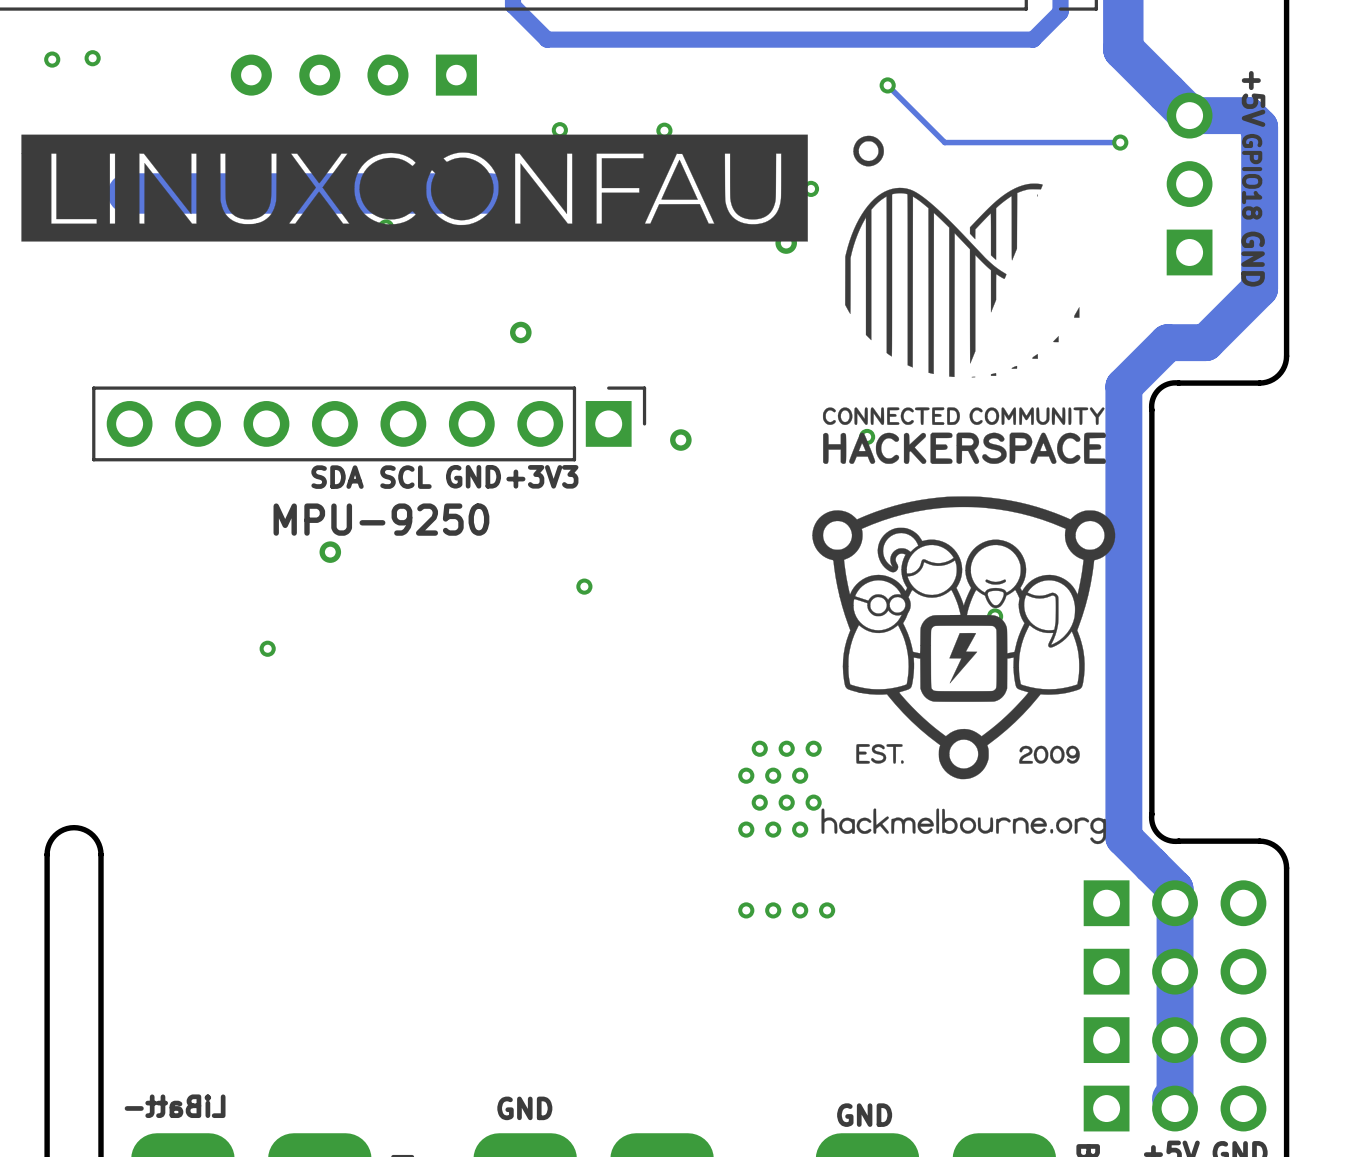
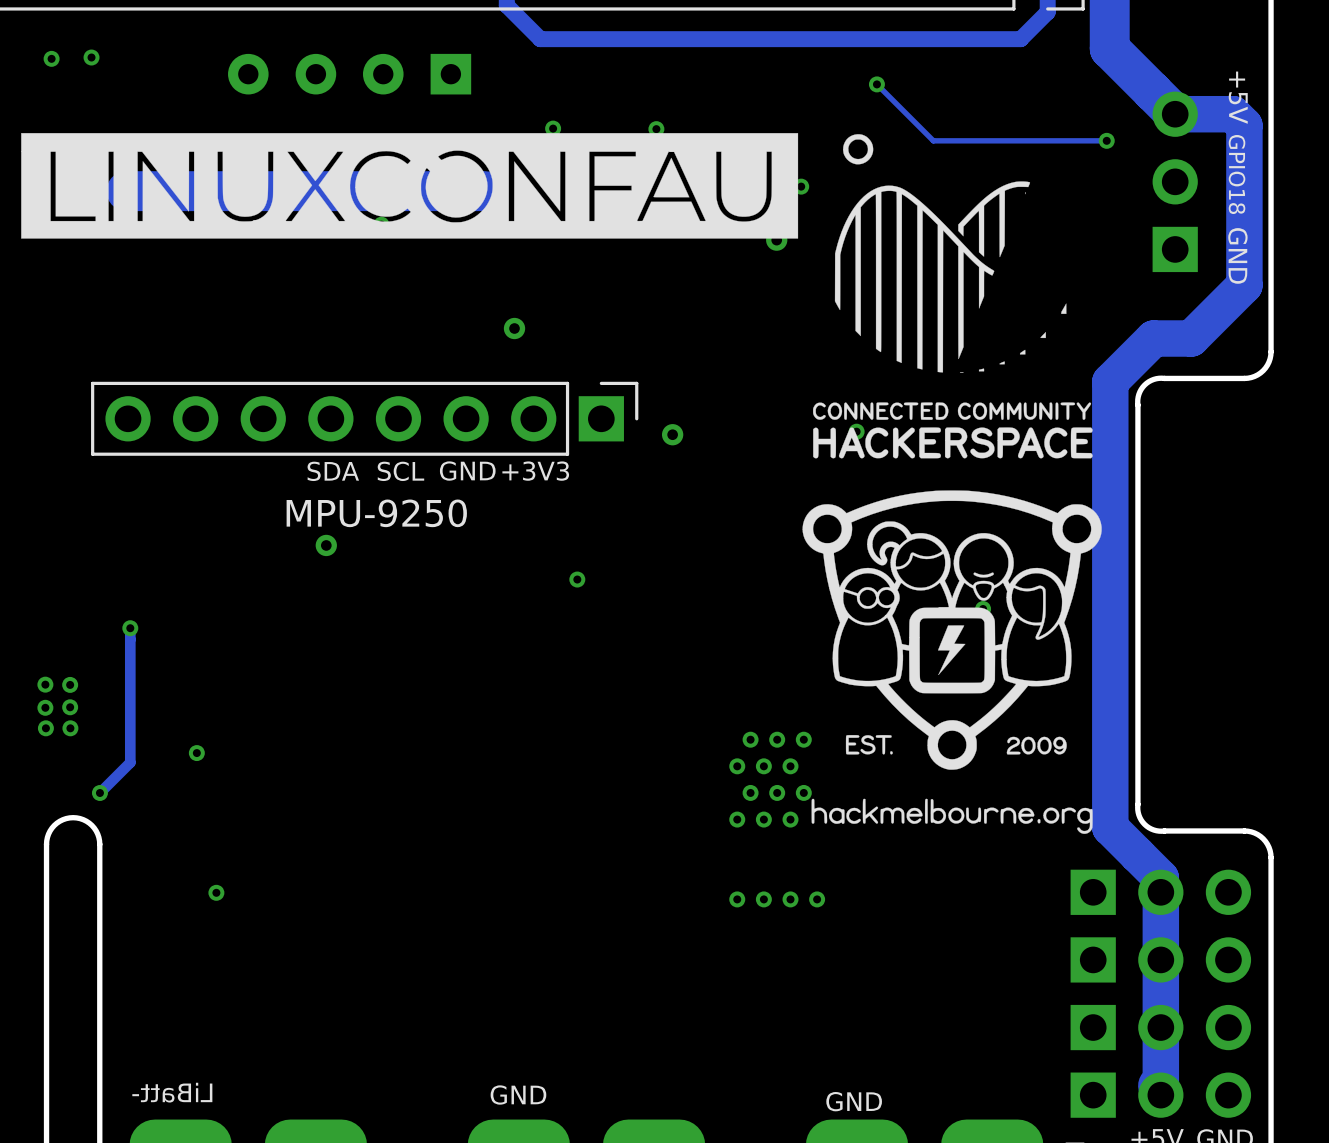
track: none -> (130, 628) (130, 762) (99, 792)
via: none -> (130, 628)
via: (267, 648) -> none
via: none -> (45, 684)
via: none -> (70, 684)
via: none -> (70, 707)
via: none -> (45, 707)
via: none -> (45, 728)
via: none -> (70, 728)
via: none -> (196, 753)
via: none -> (99, 792)
via: none -> (216, 892)

